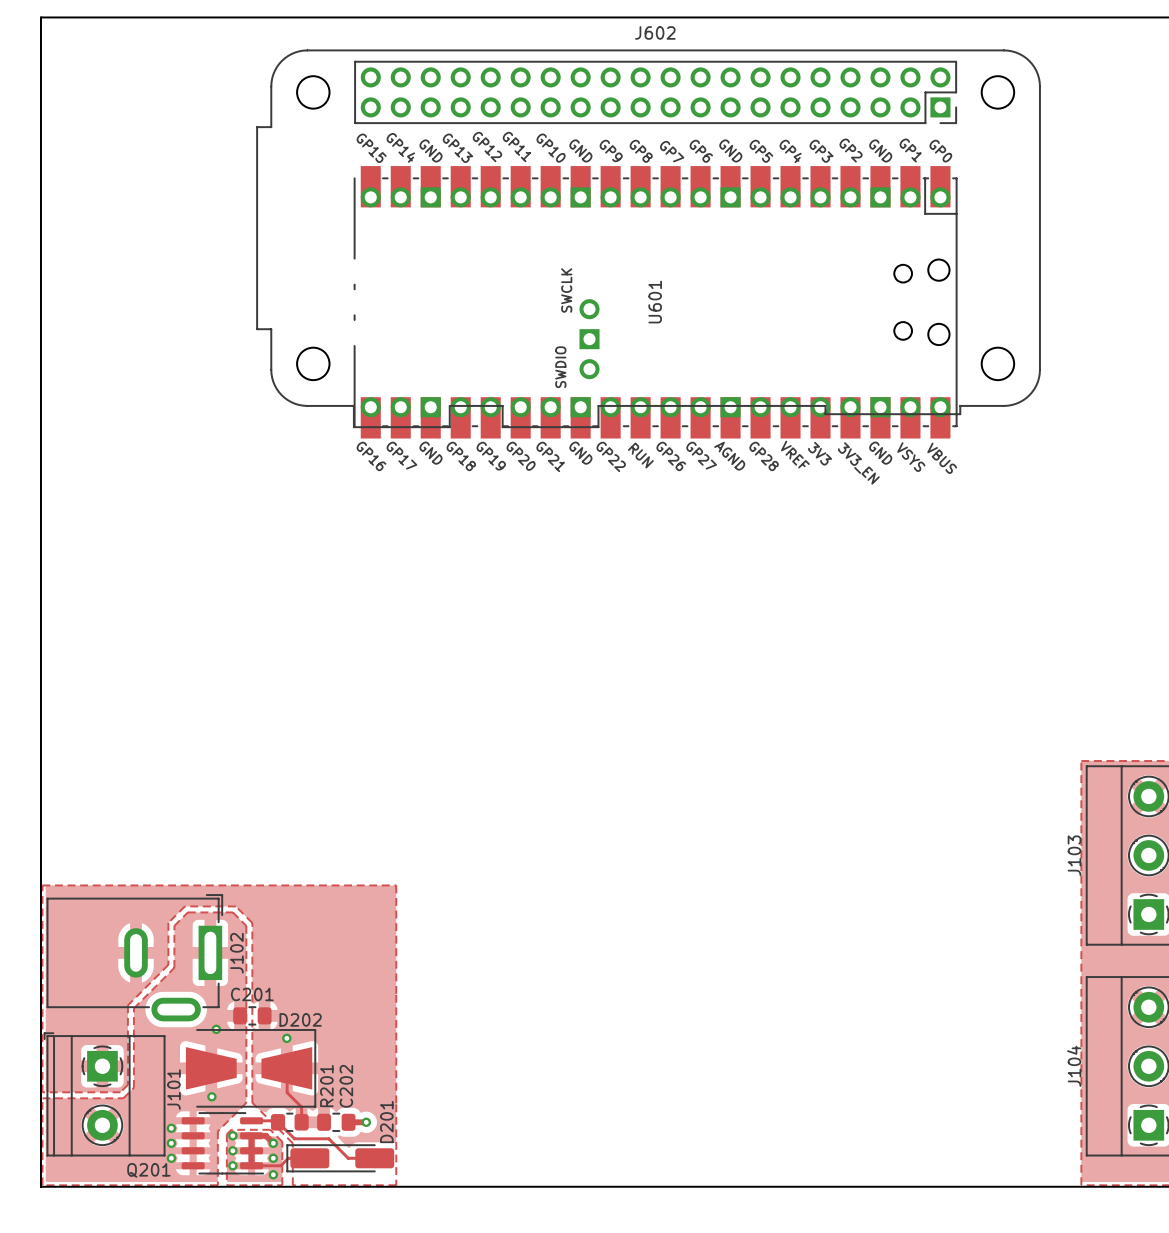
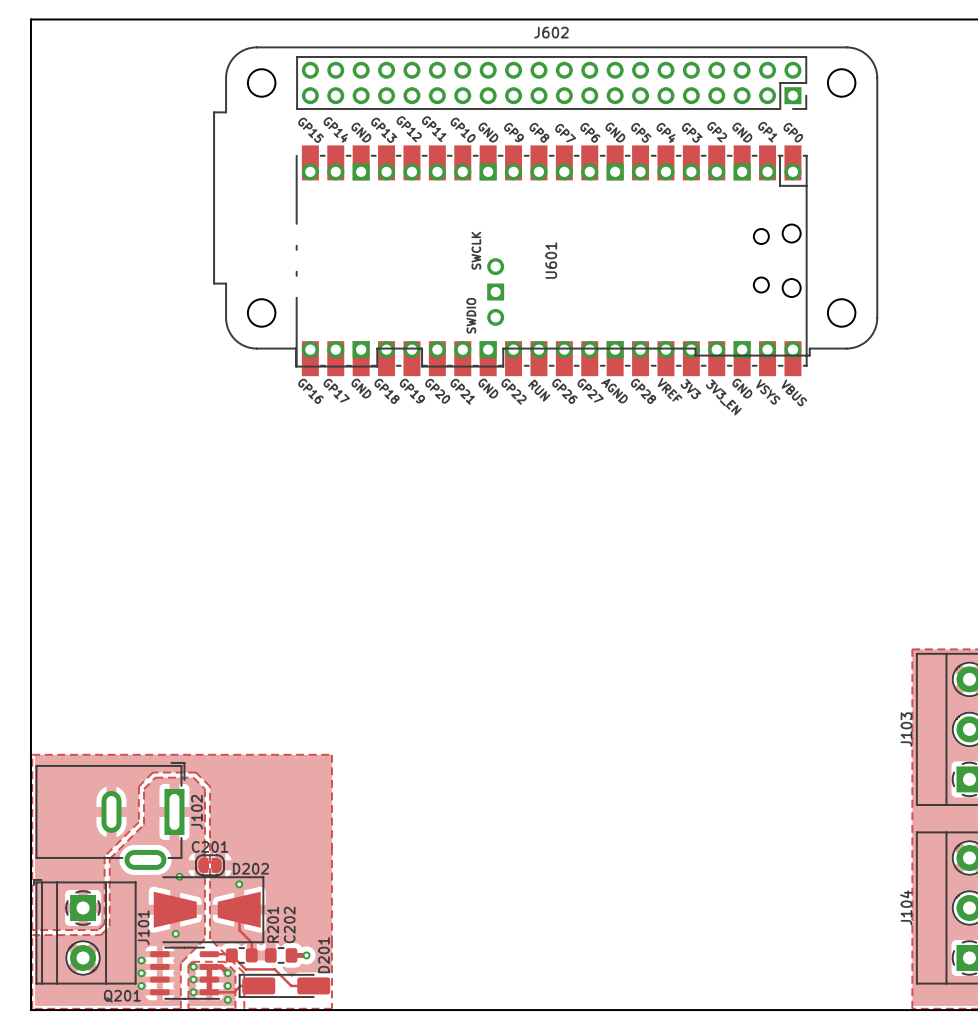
C201 footprint: [233, 1006, 272, 1026] -> [195, 854, 225, 876]

